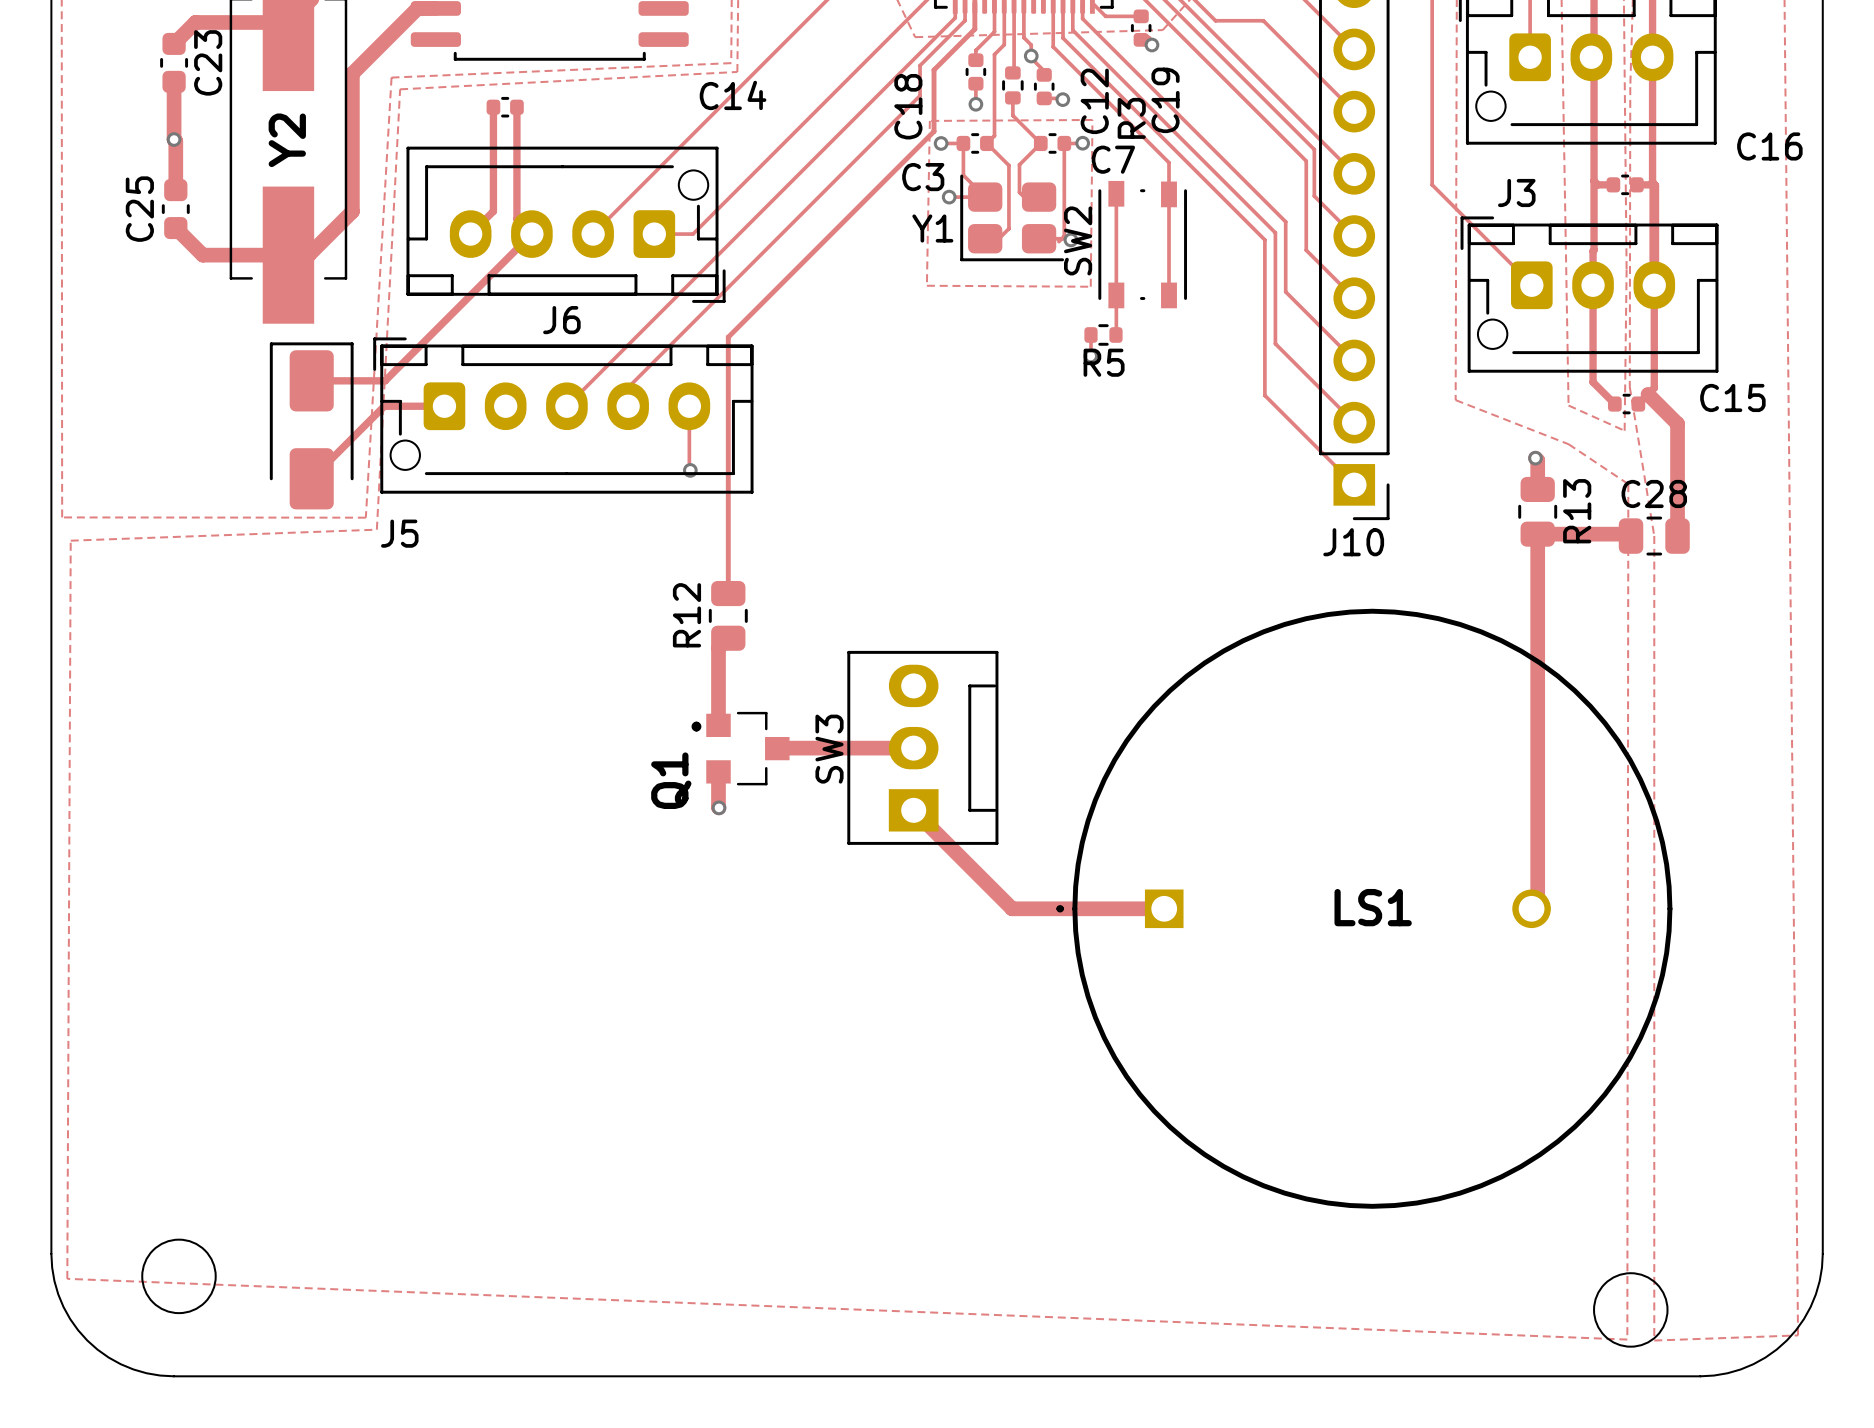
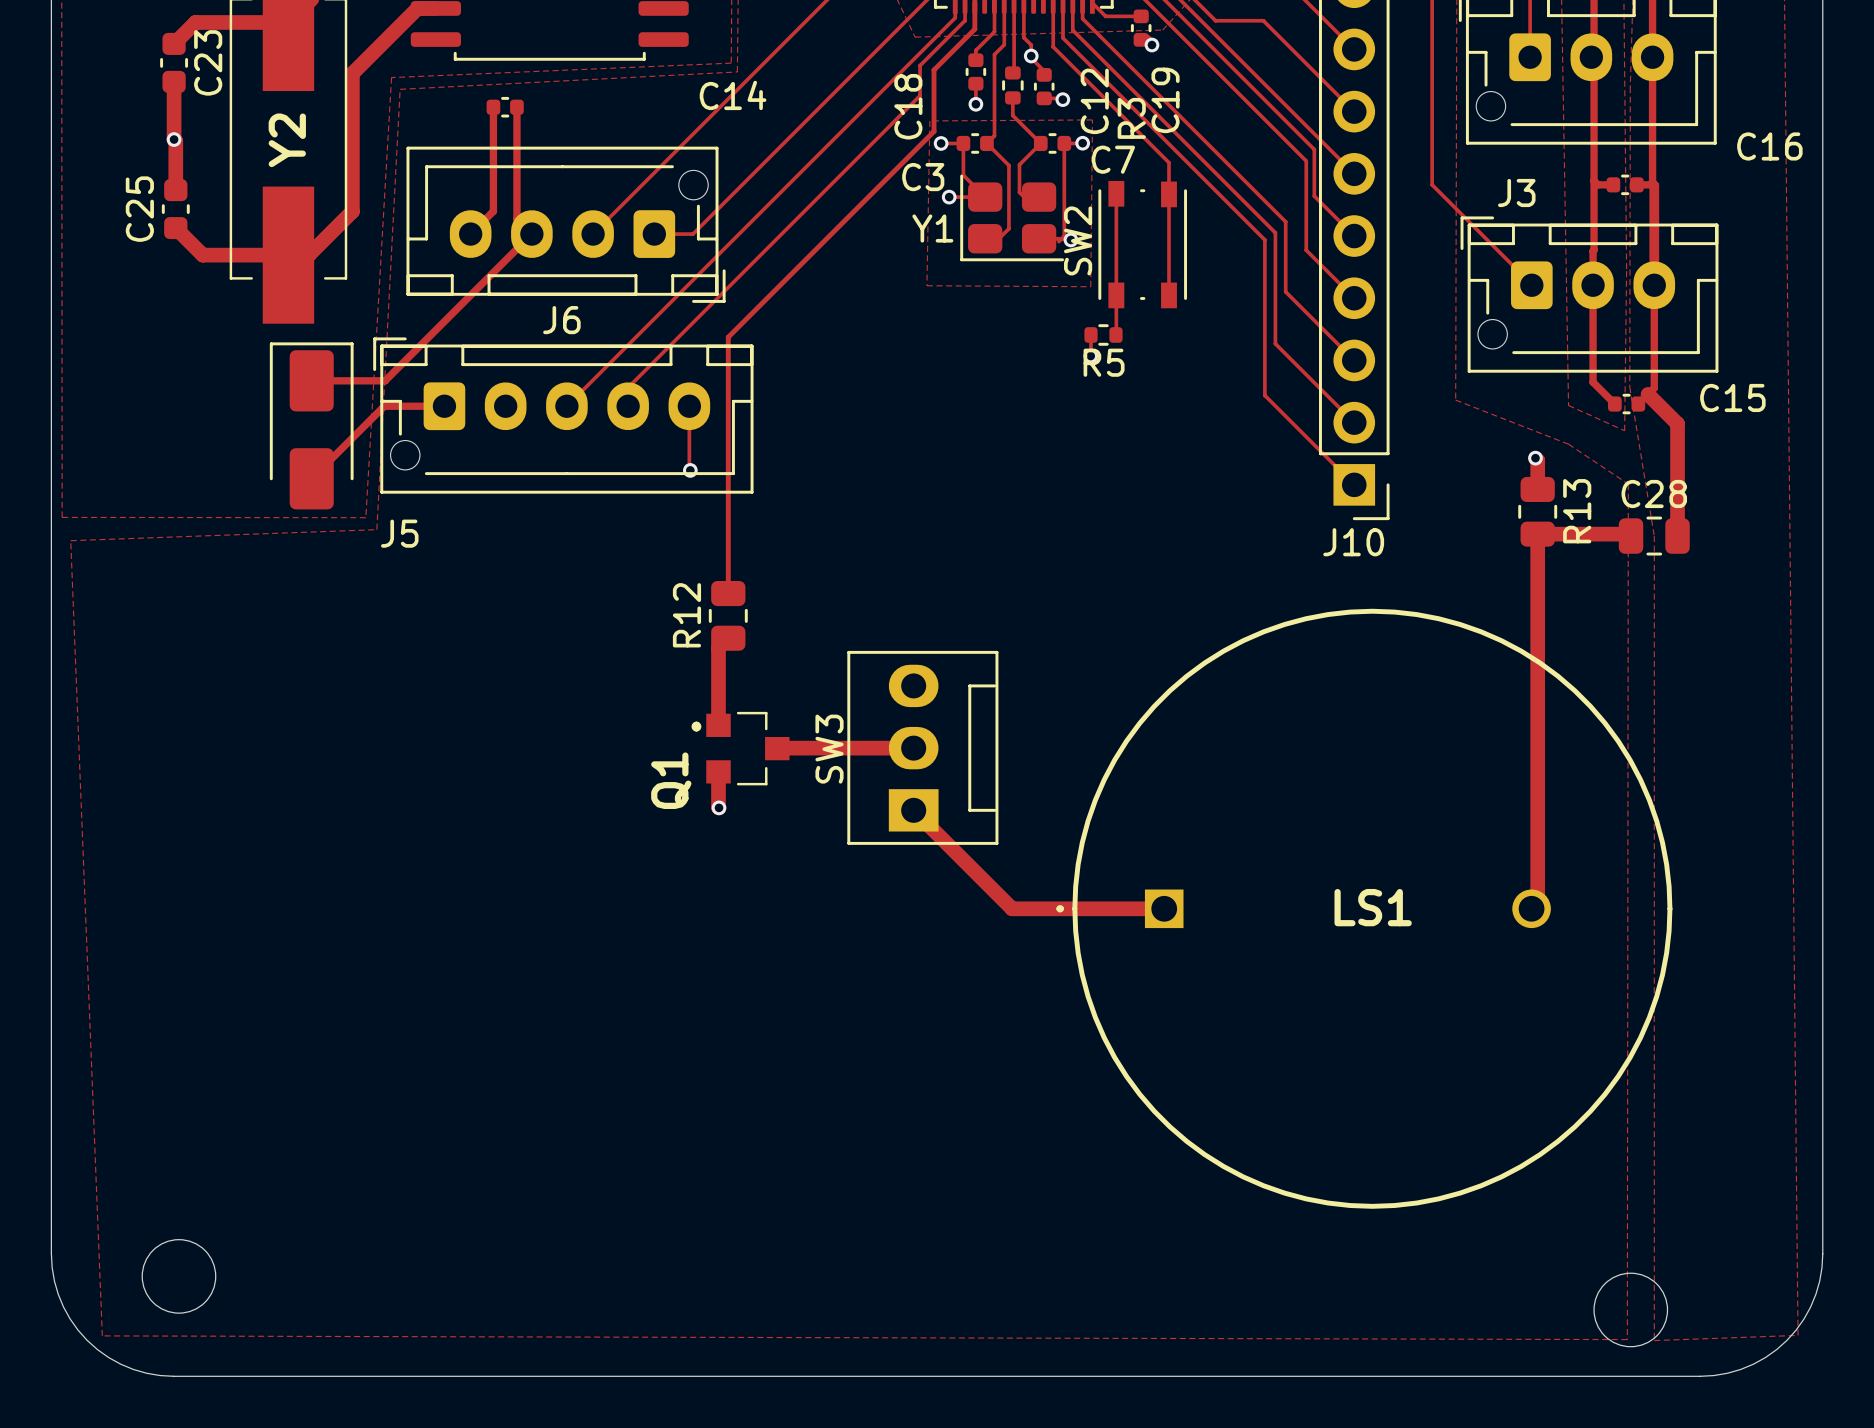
zone outline: (70, 540) (67, 1278) (1627, 1339) -> (70, 540) (102, 1335) (1627, 1339)

